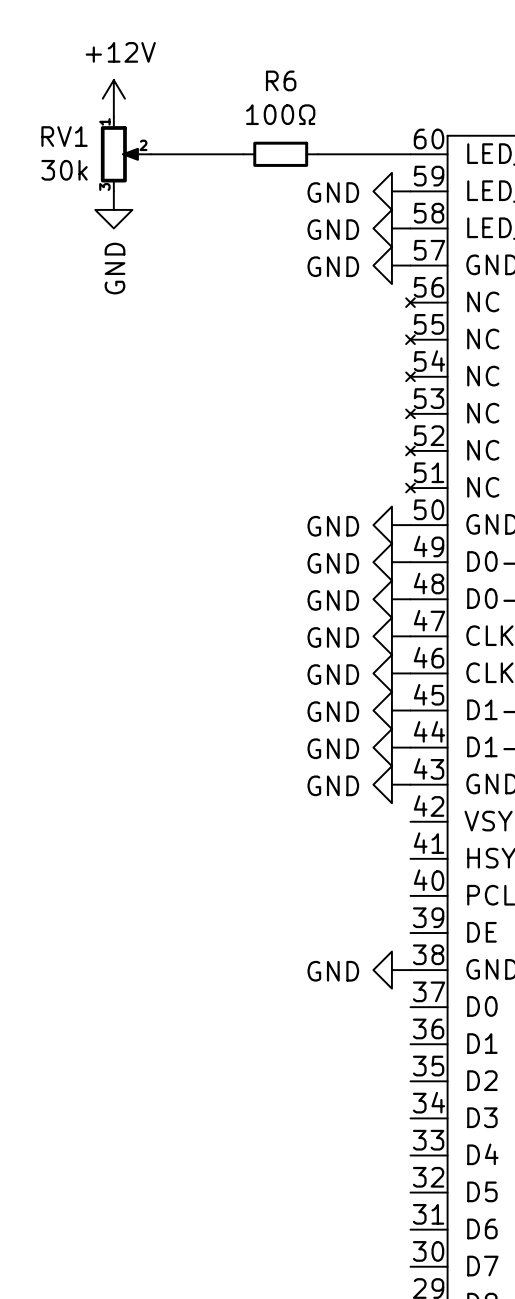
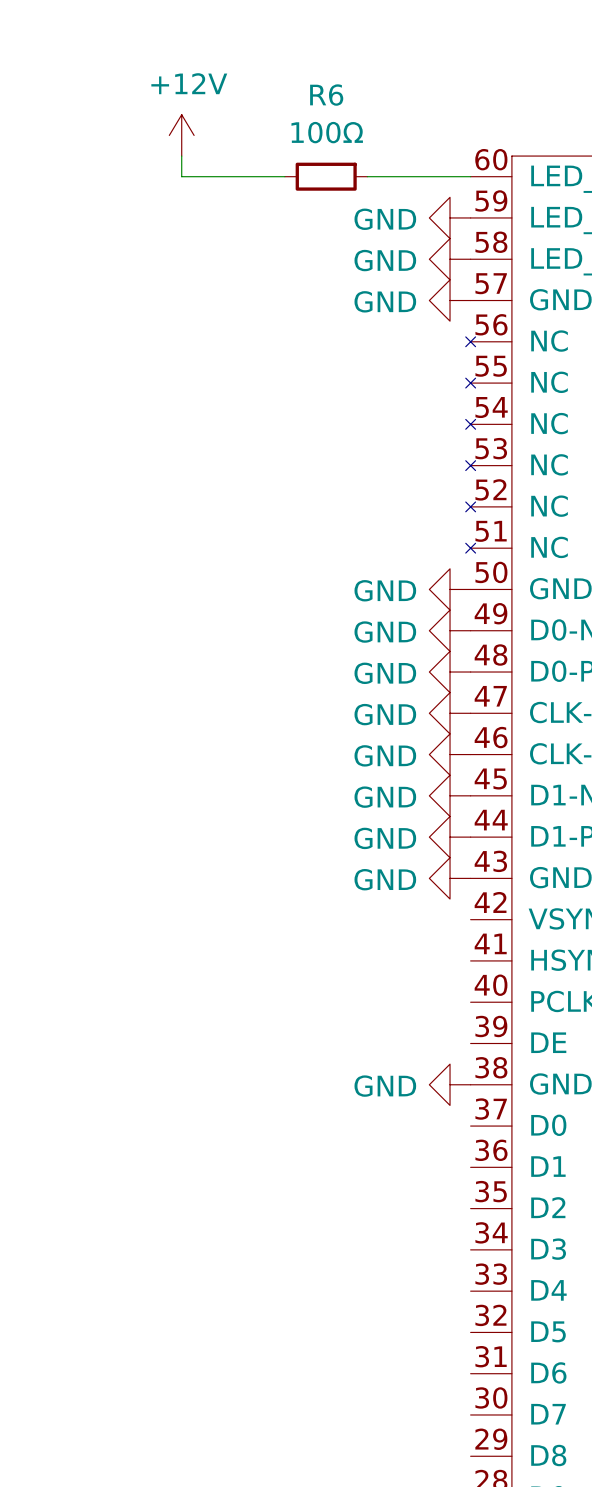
power symbol position: +12V (113, 98) -> +12V (181, 135)
wire: none -> (181, 156) (181, 176)
RV1: 30k (125, 154) -> none
power symbol: GND (113, 209) -> none

